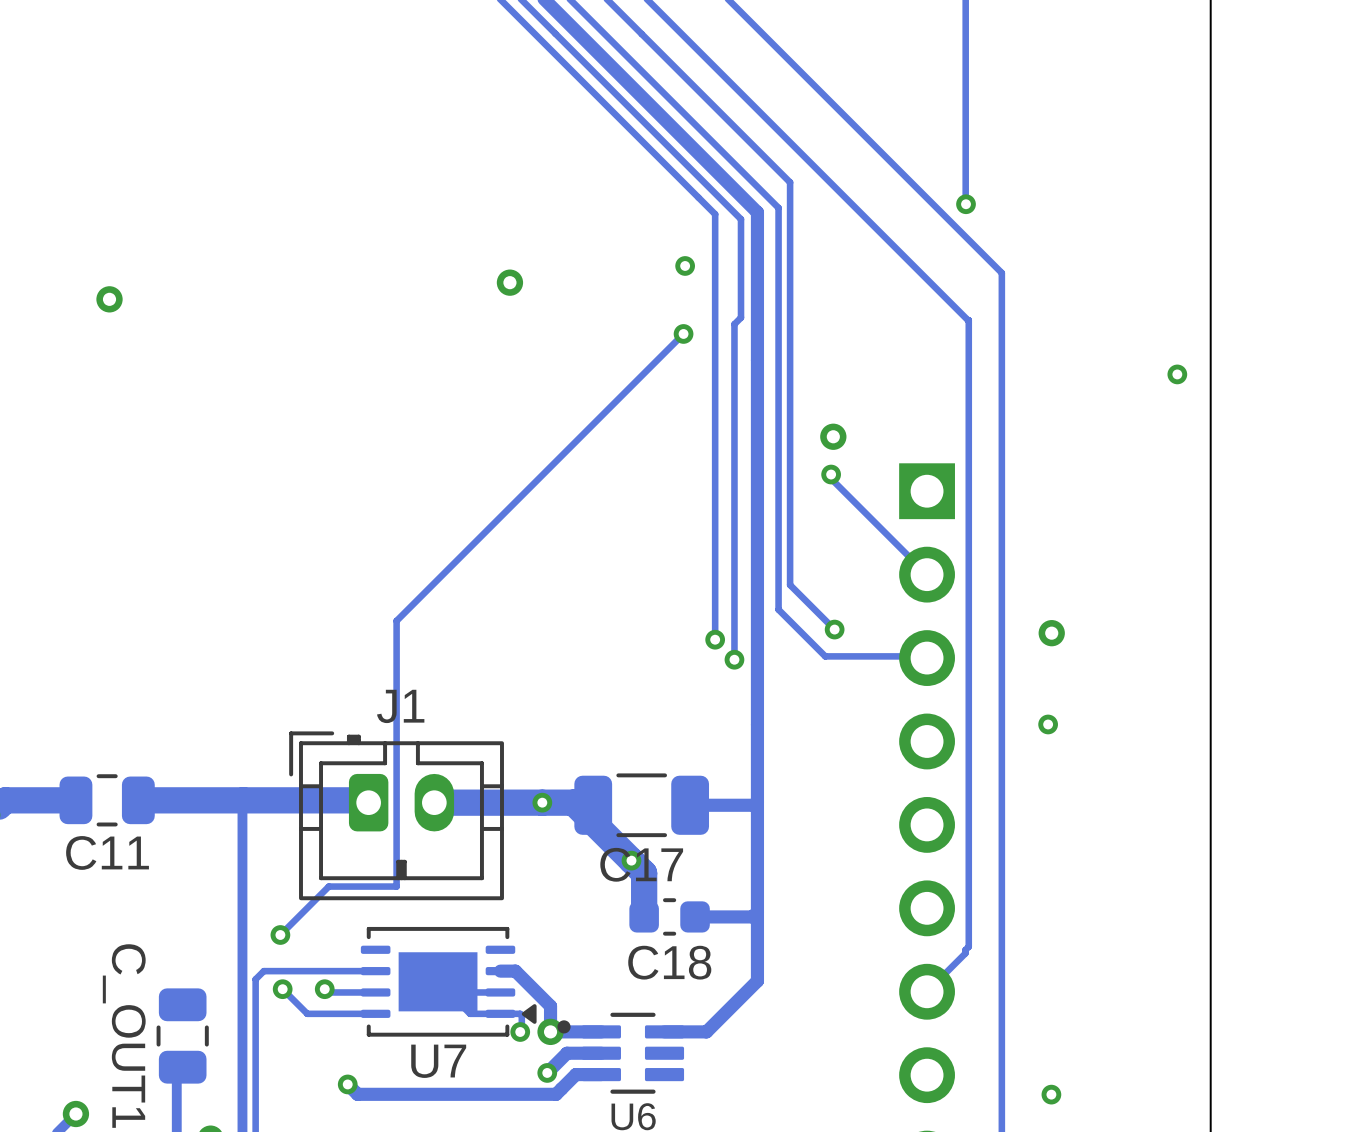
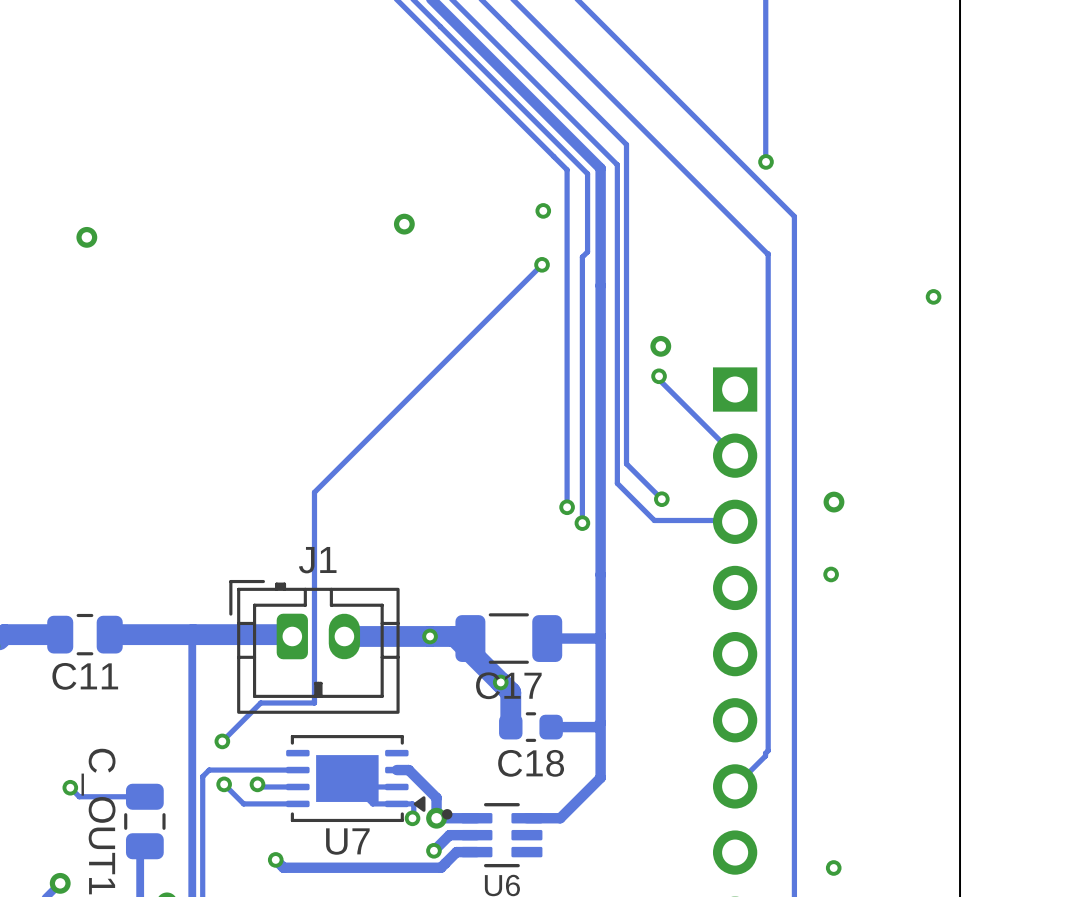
track: none -> (70, 787) (79, 796) (144, 796)
via: none -> (70, 787)

